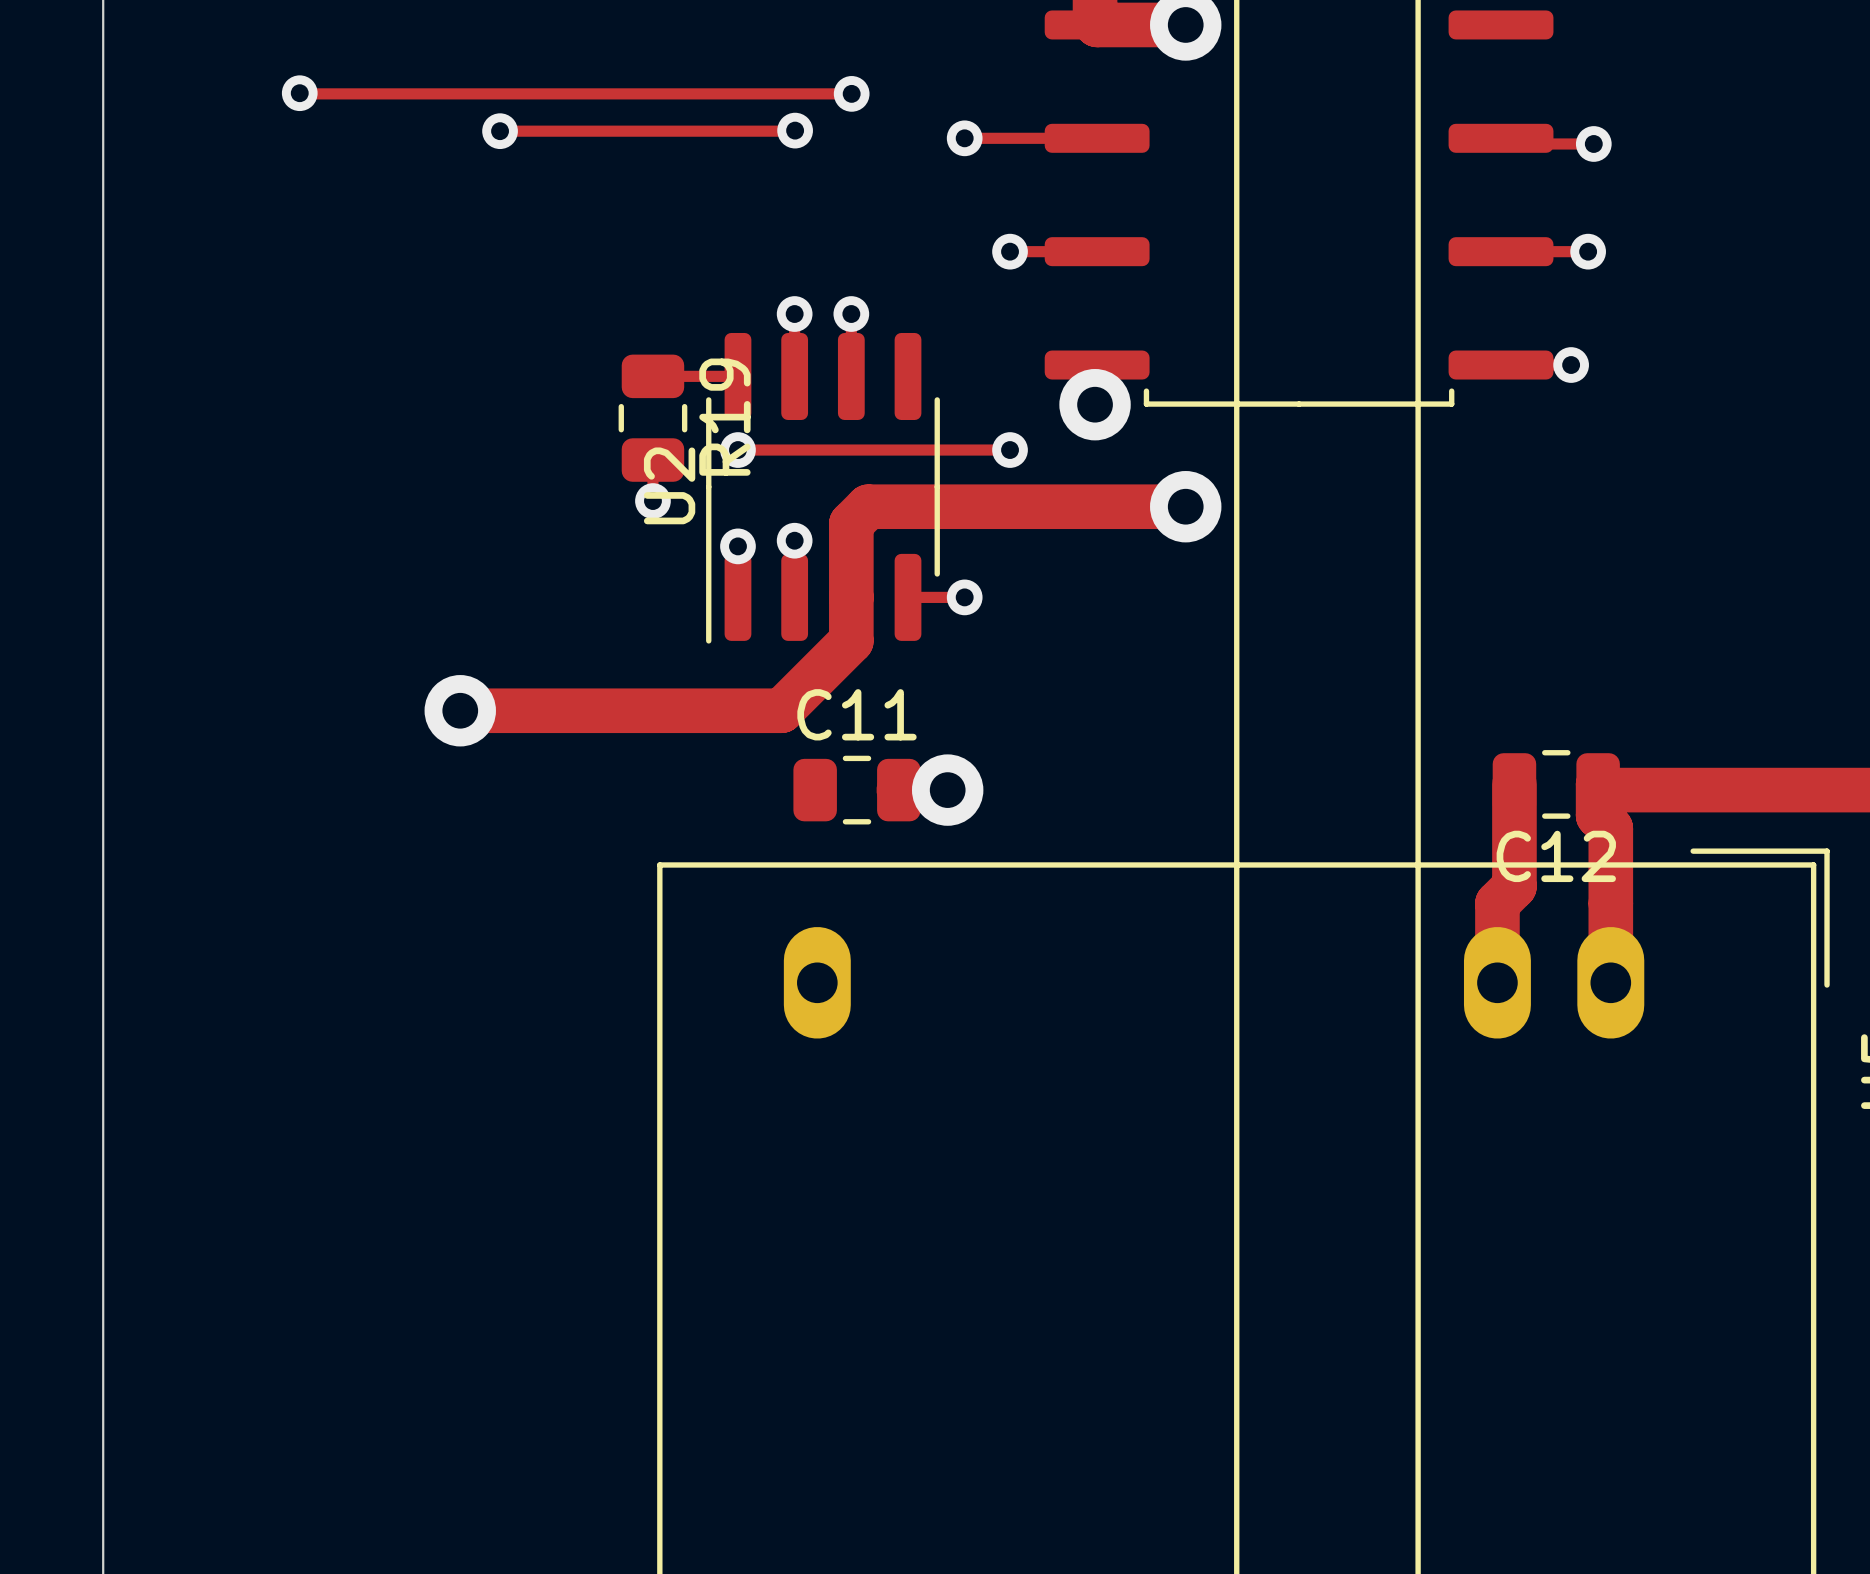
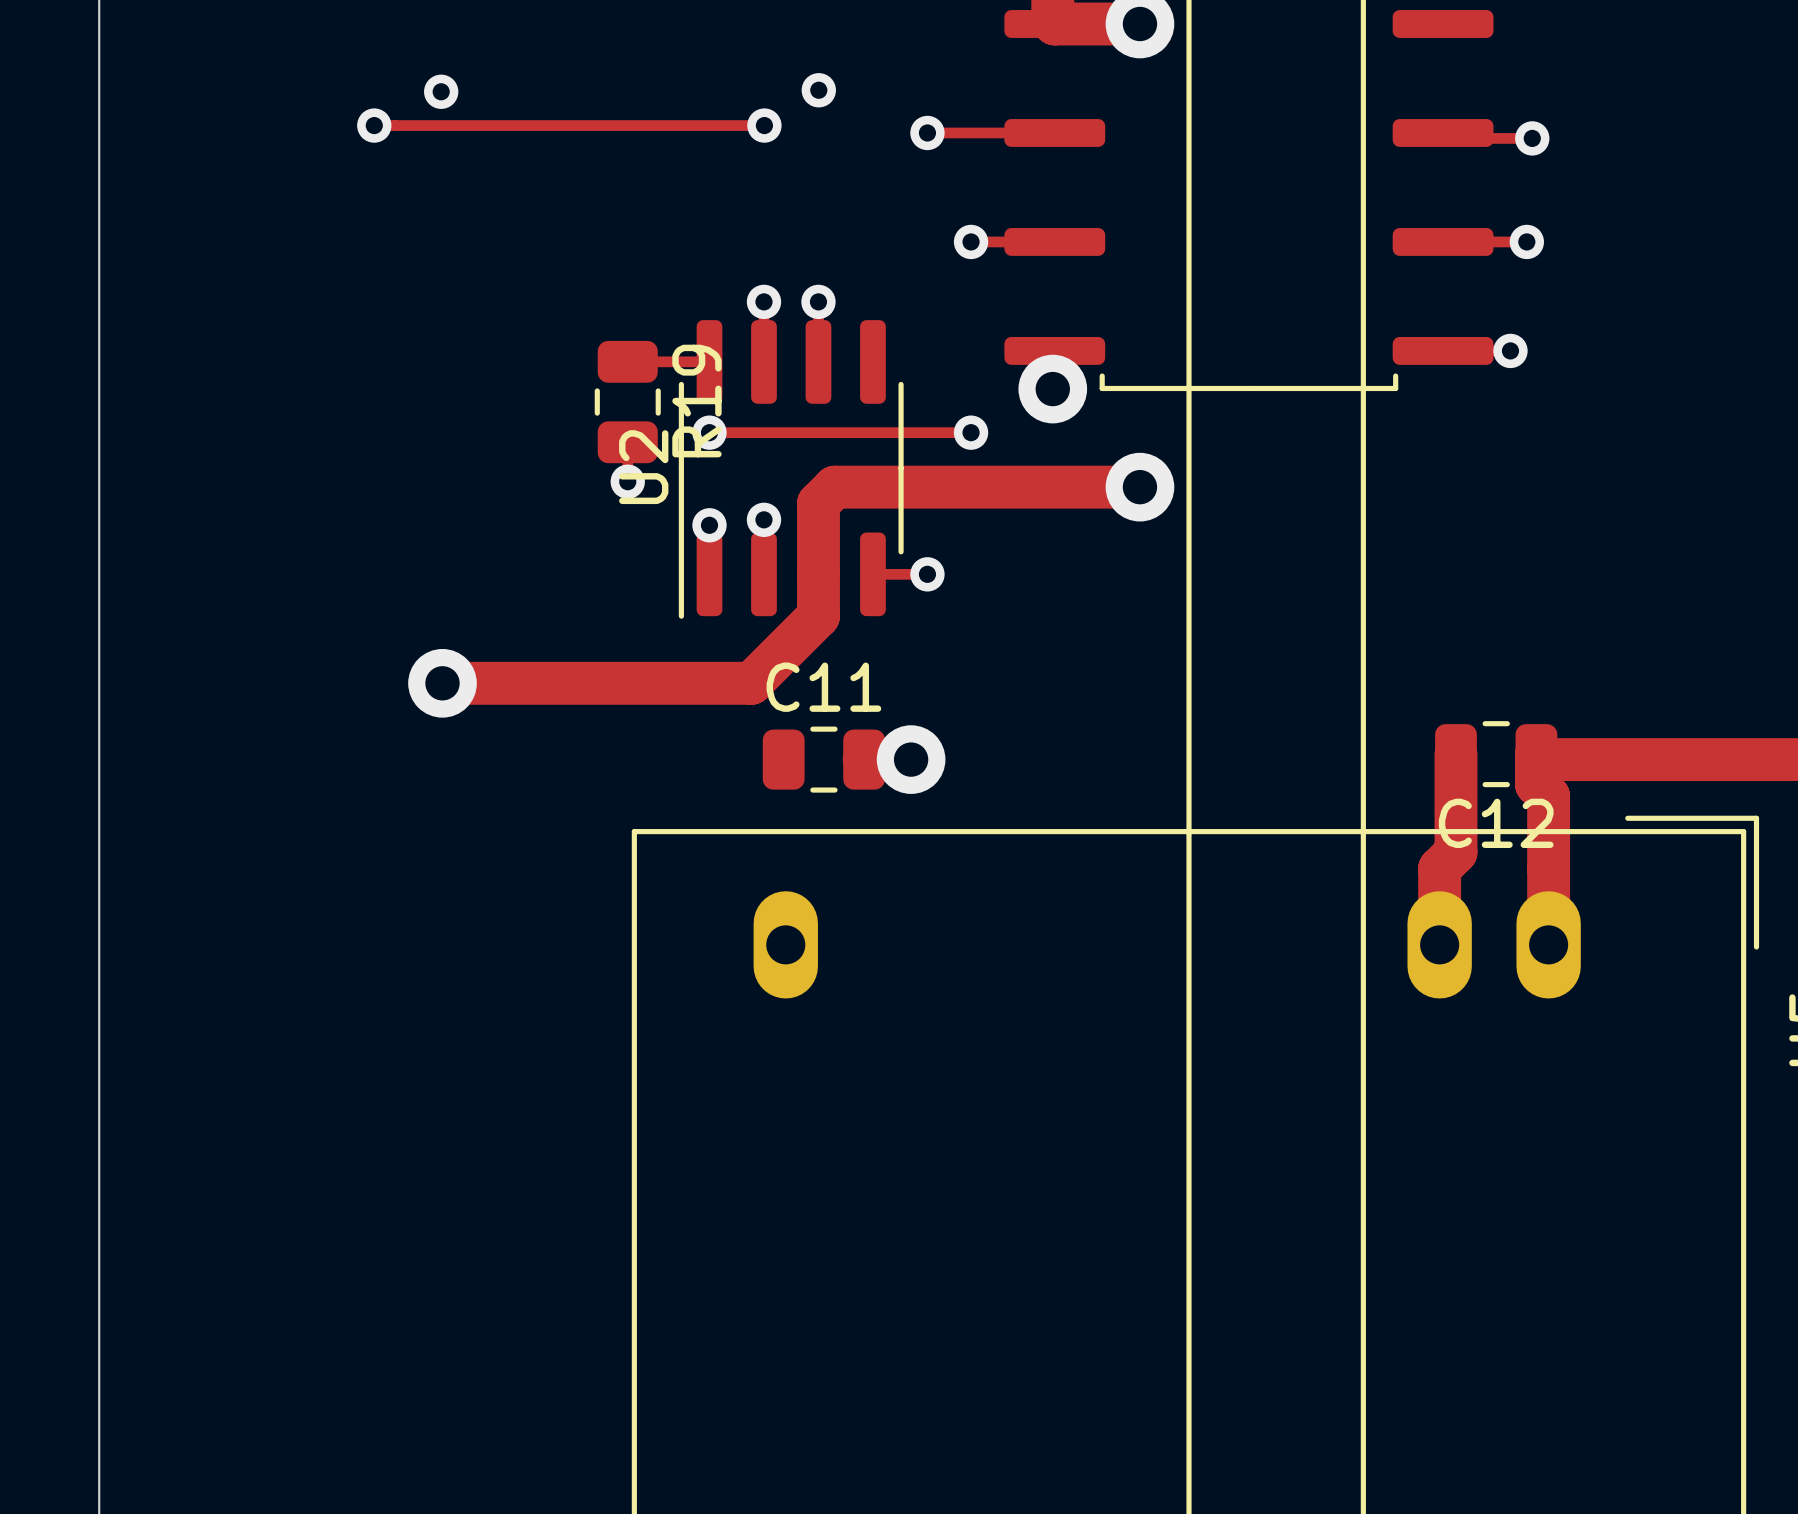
track: (299, 93) (851, 93) -> none
via: (299, 93) -> none
via: none -> (374, 125)
track: (500, 131) (794, 131) -> (374, 125) (764, 125)
via position: (500, 131) -> (441, 91)

